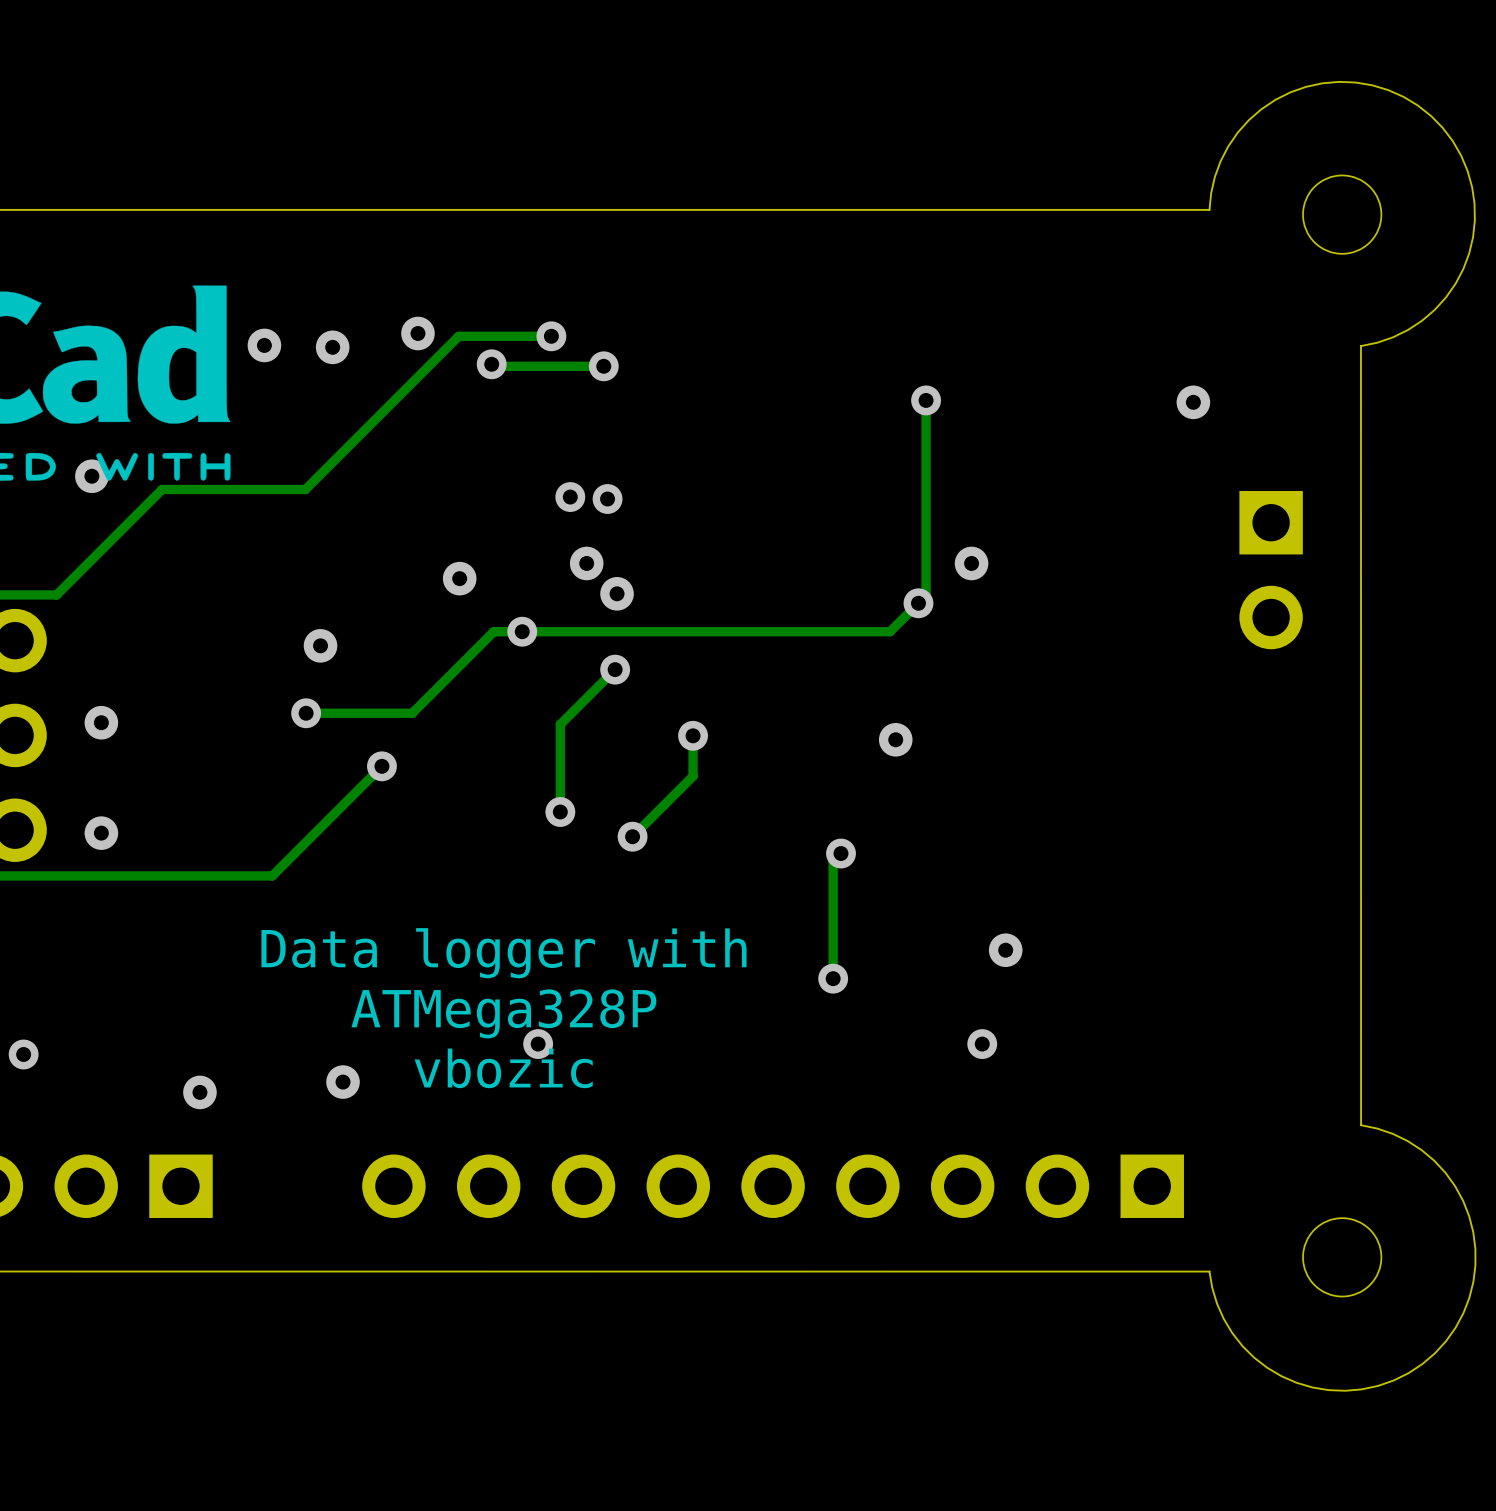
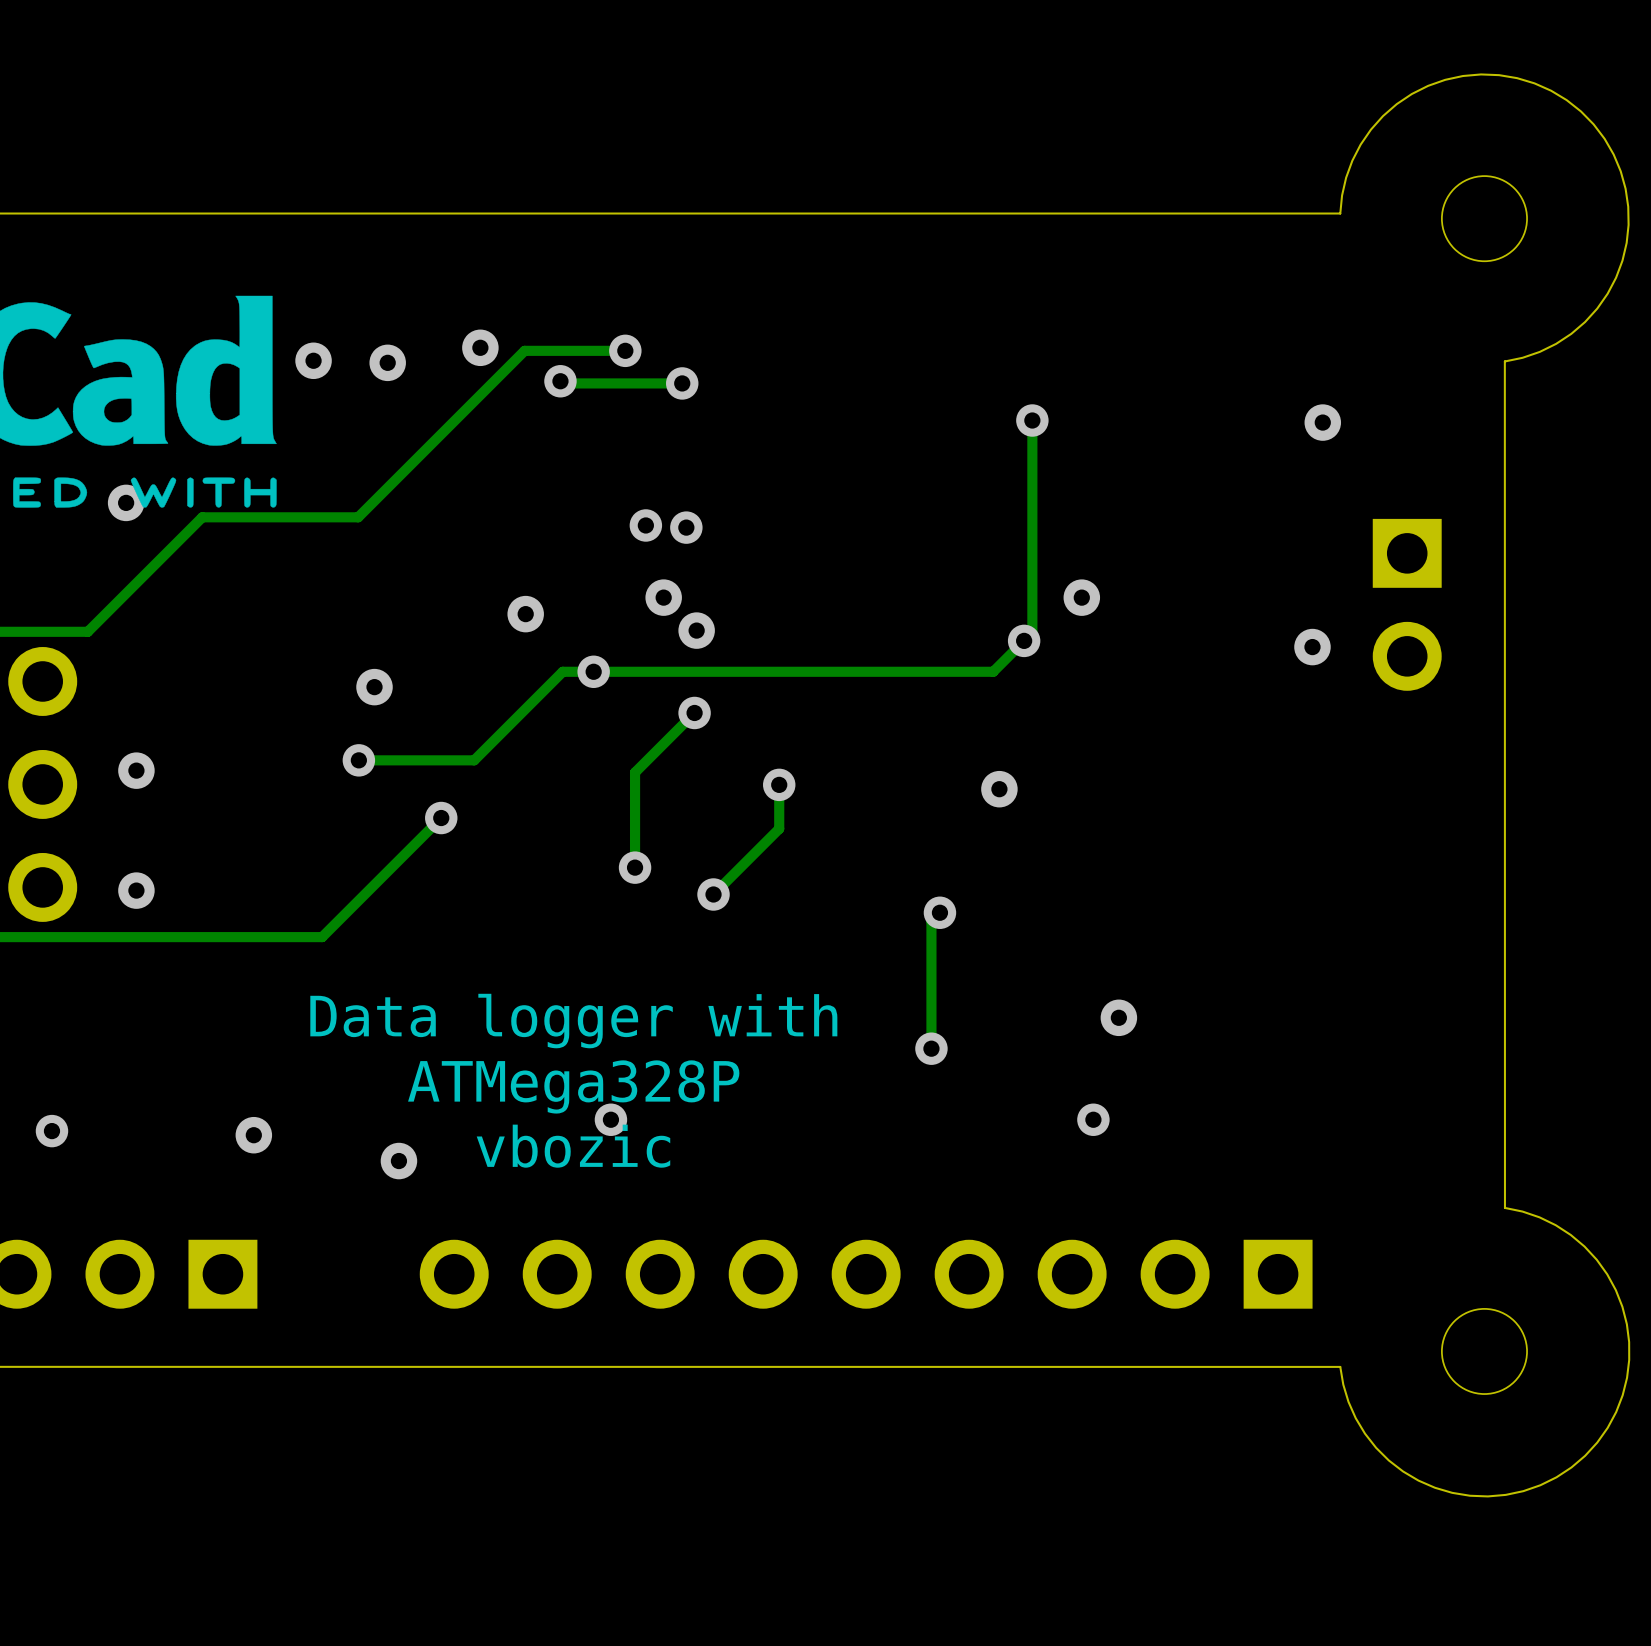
via: none -> (1312, 647)
via position: (199, 1092) -> (253, 1135)

